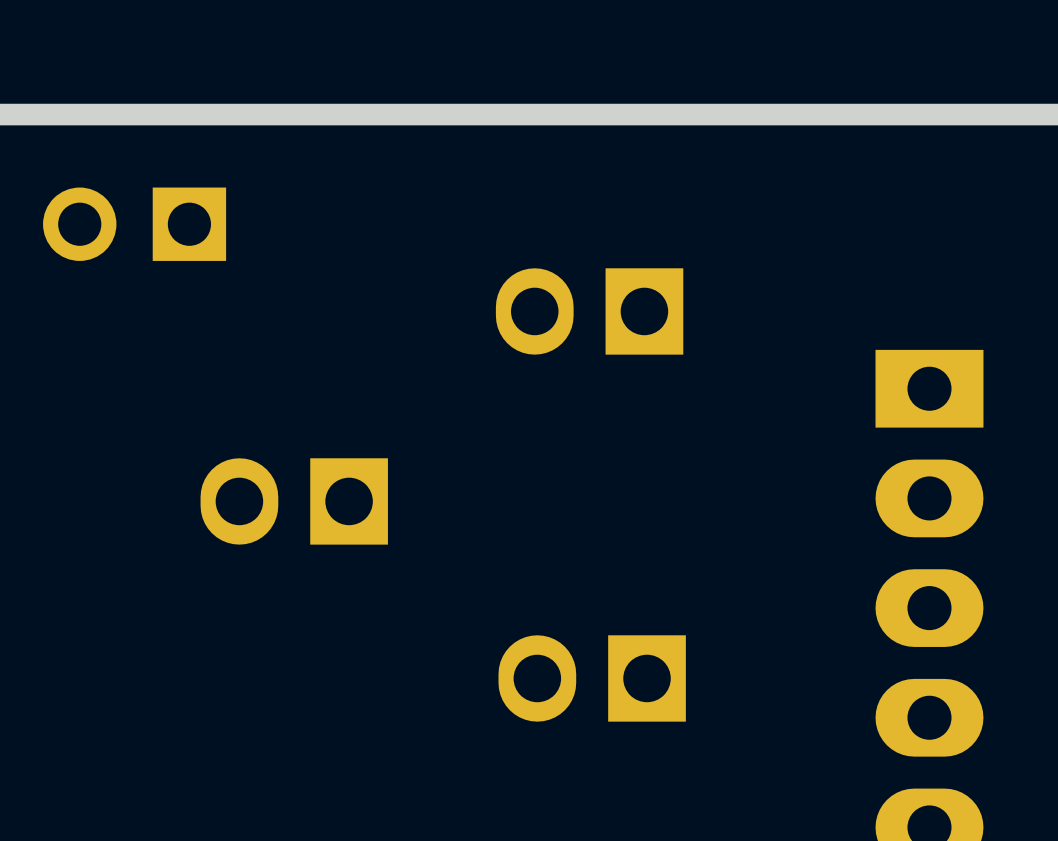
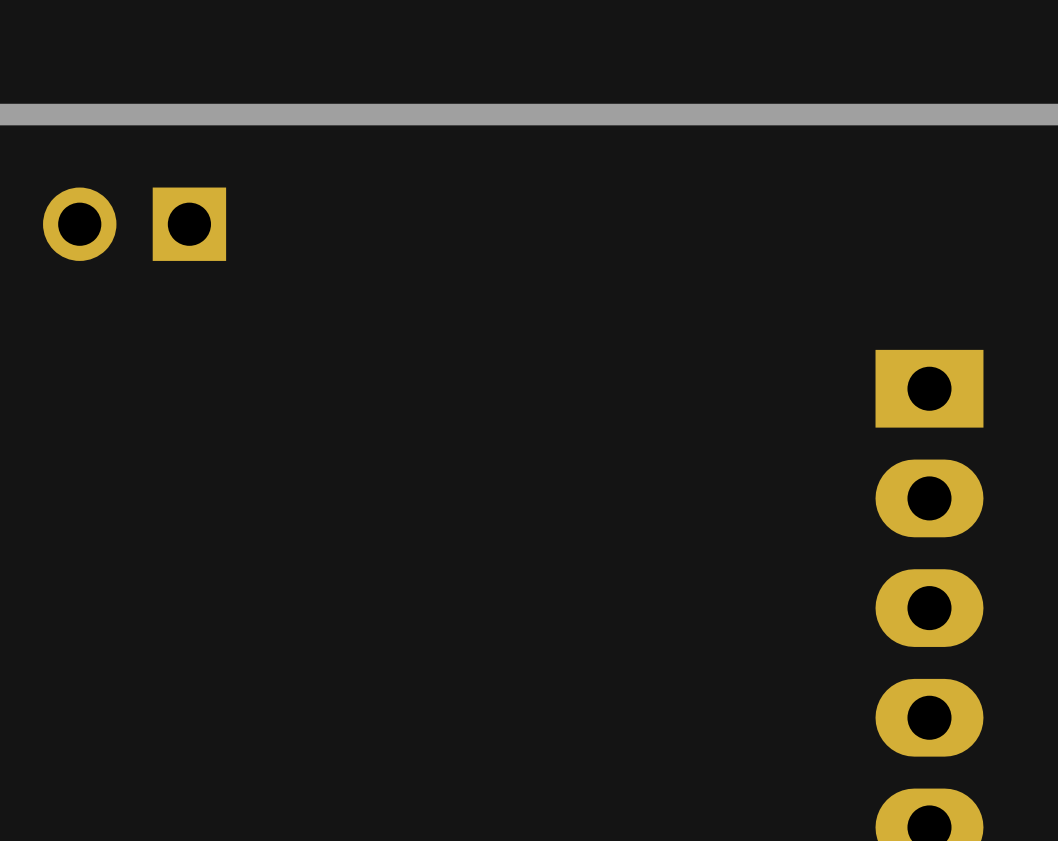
part: (589, 311) -> none
part: (294, 501) -> none
part: (592, 678) -> none

